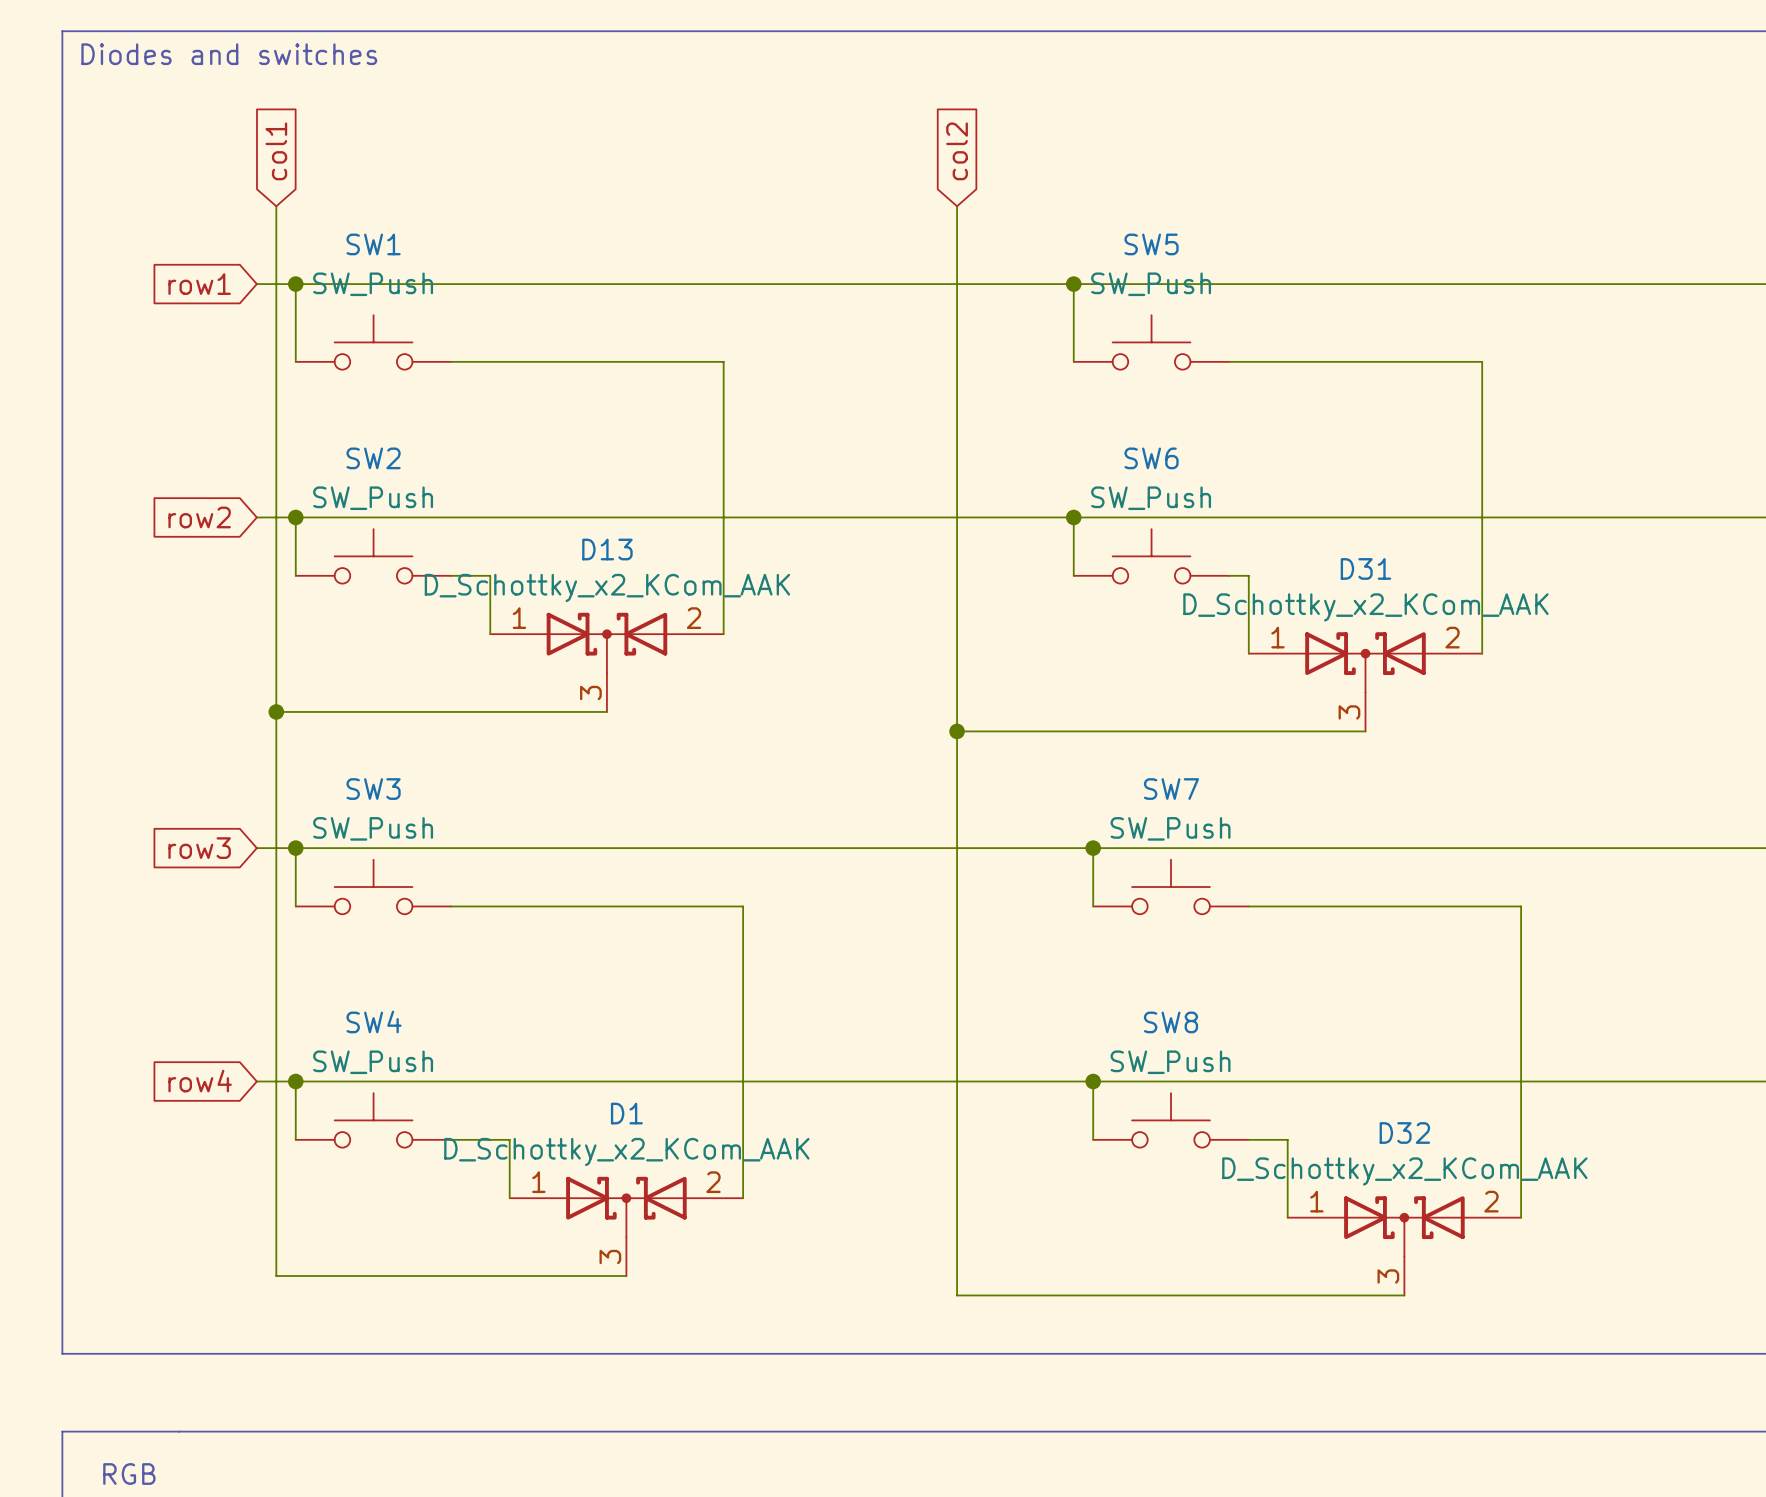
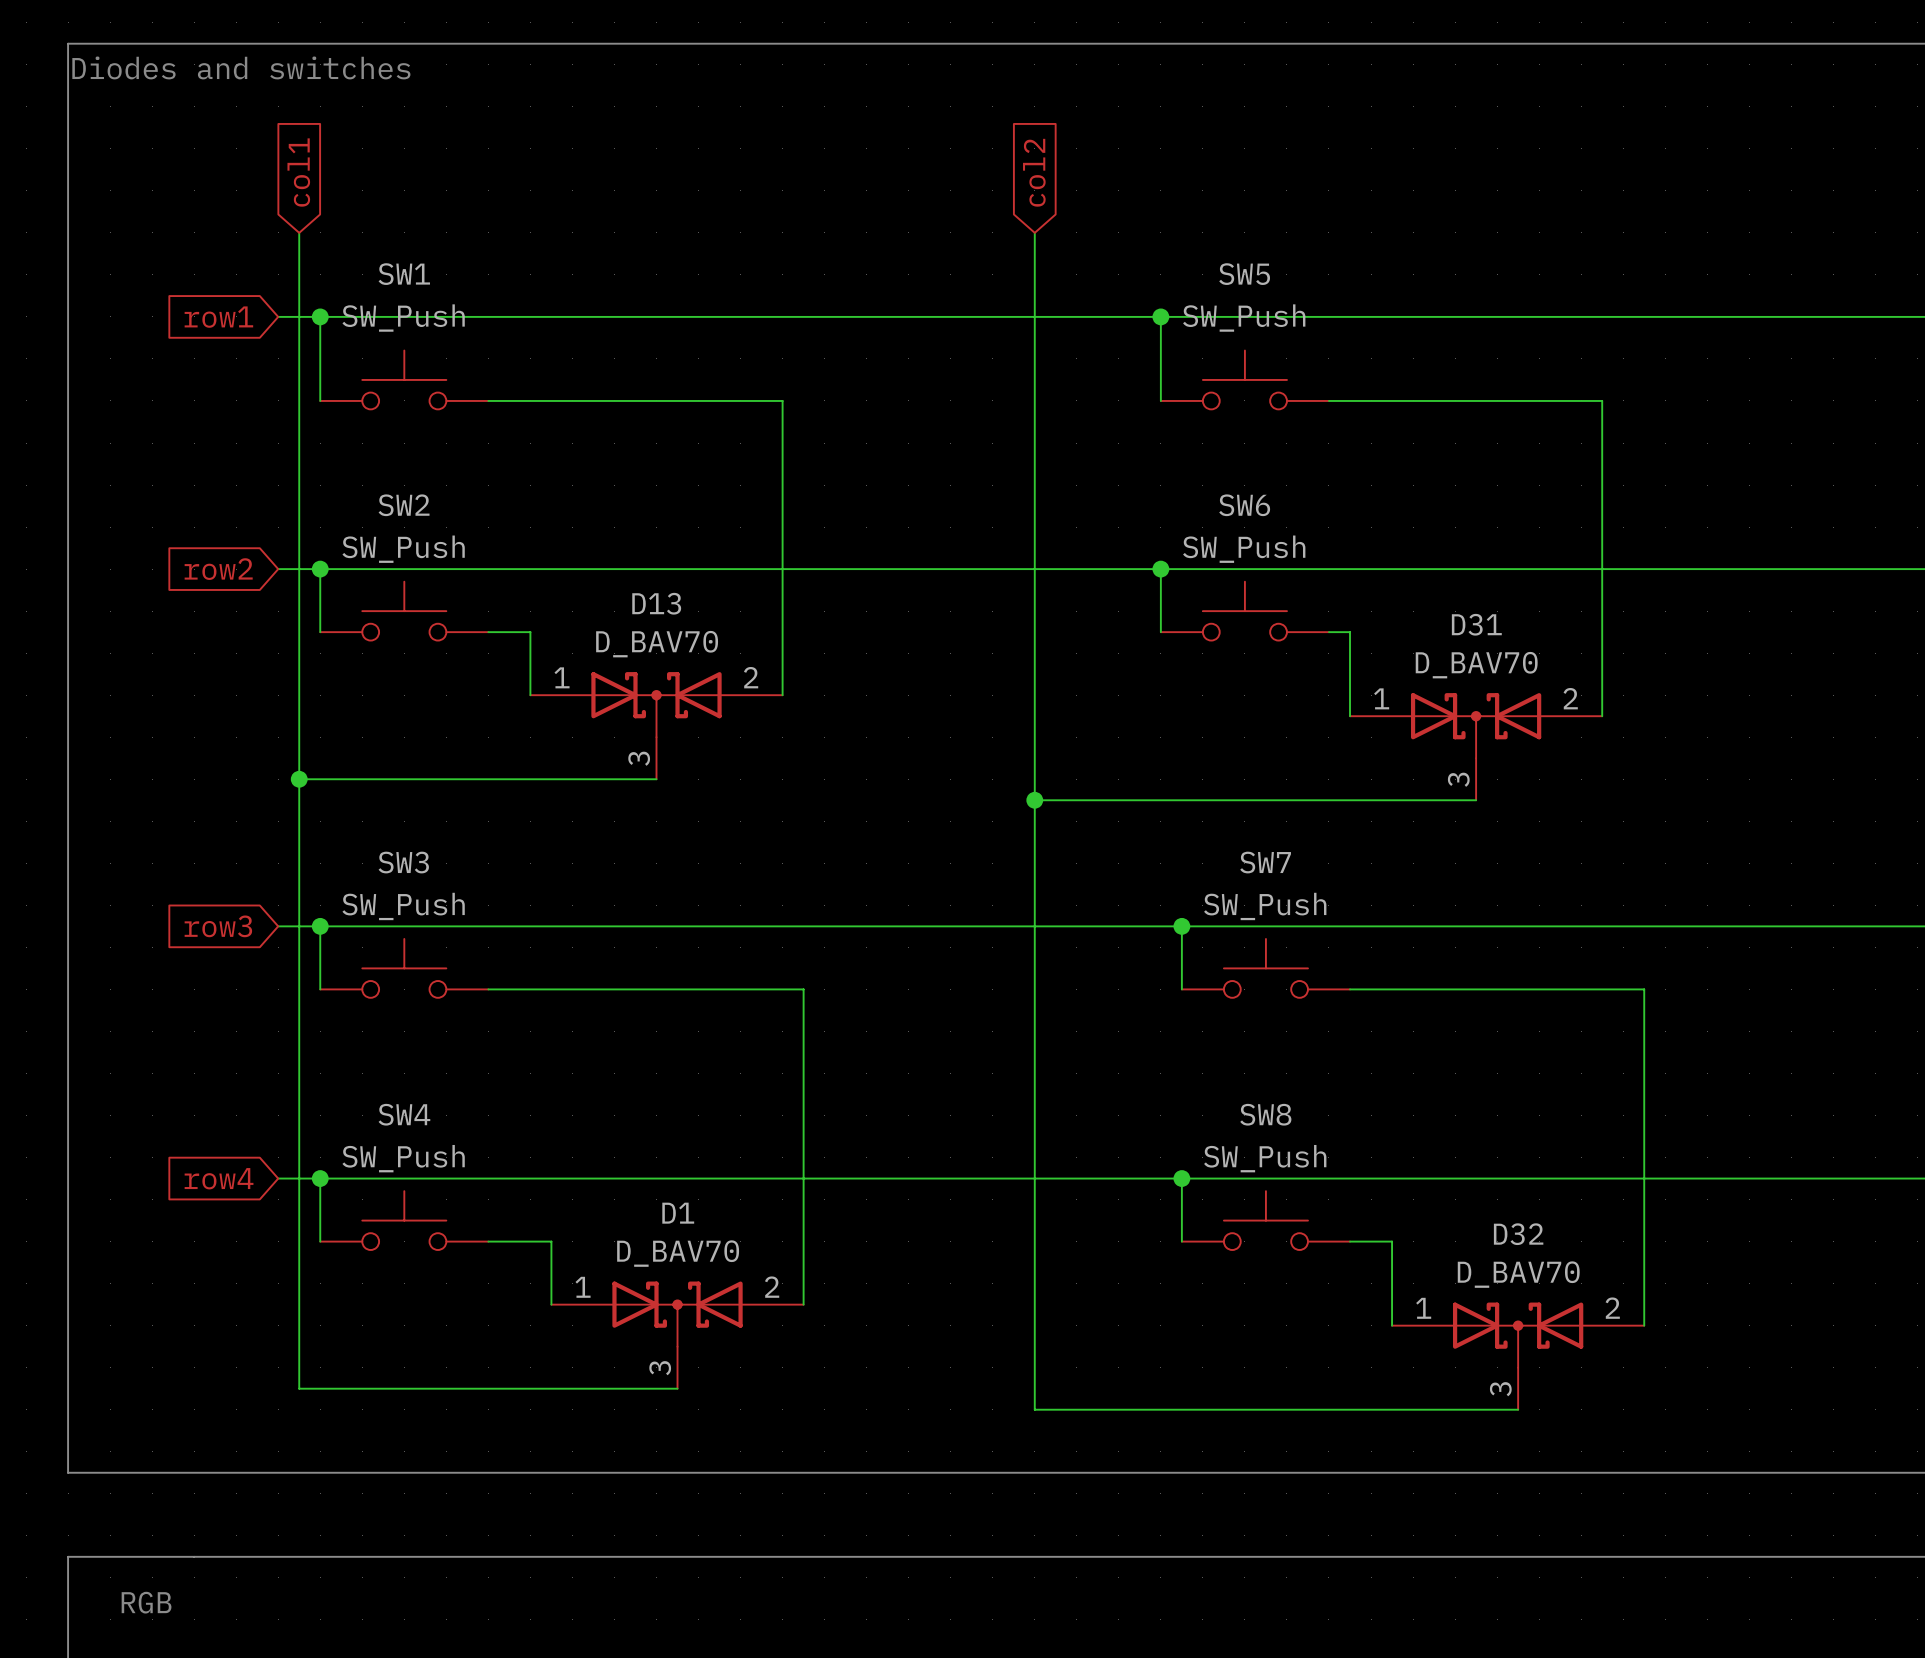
D13 value: D_Schottky_x2_KCom_AAK (607, 587) -> D_BAV70 (657, 644)
D31 value: D_Schottky_x2_KCom_AAK (1365, 607) -> D_BAV70 (1476, 665)
D1 value: D_Schottky_x2_KCom_AAK (626, 1151) -> D_BAV70 (678, 1253)
D32 value: D_Schottky_x2_KCom_AAK (1404, 1171) -> D_BAV70 (1518, 1274)

